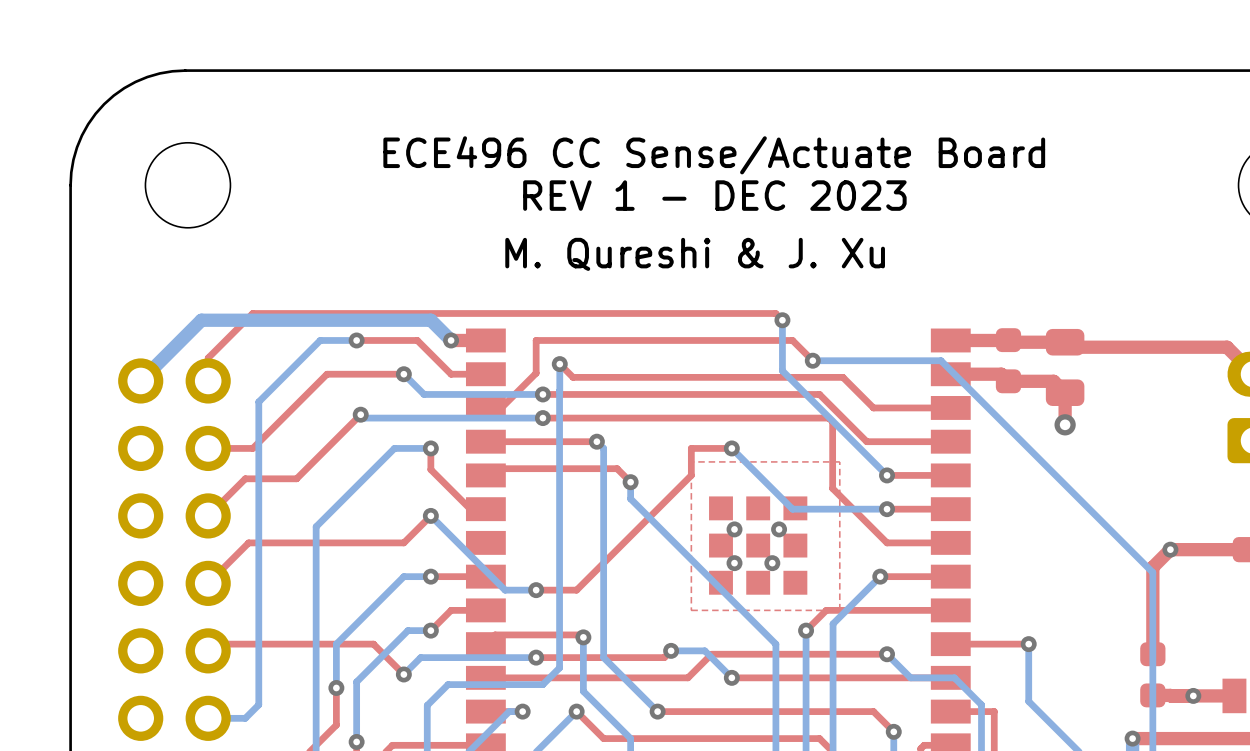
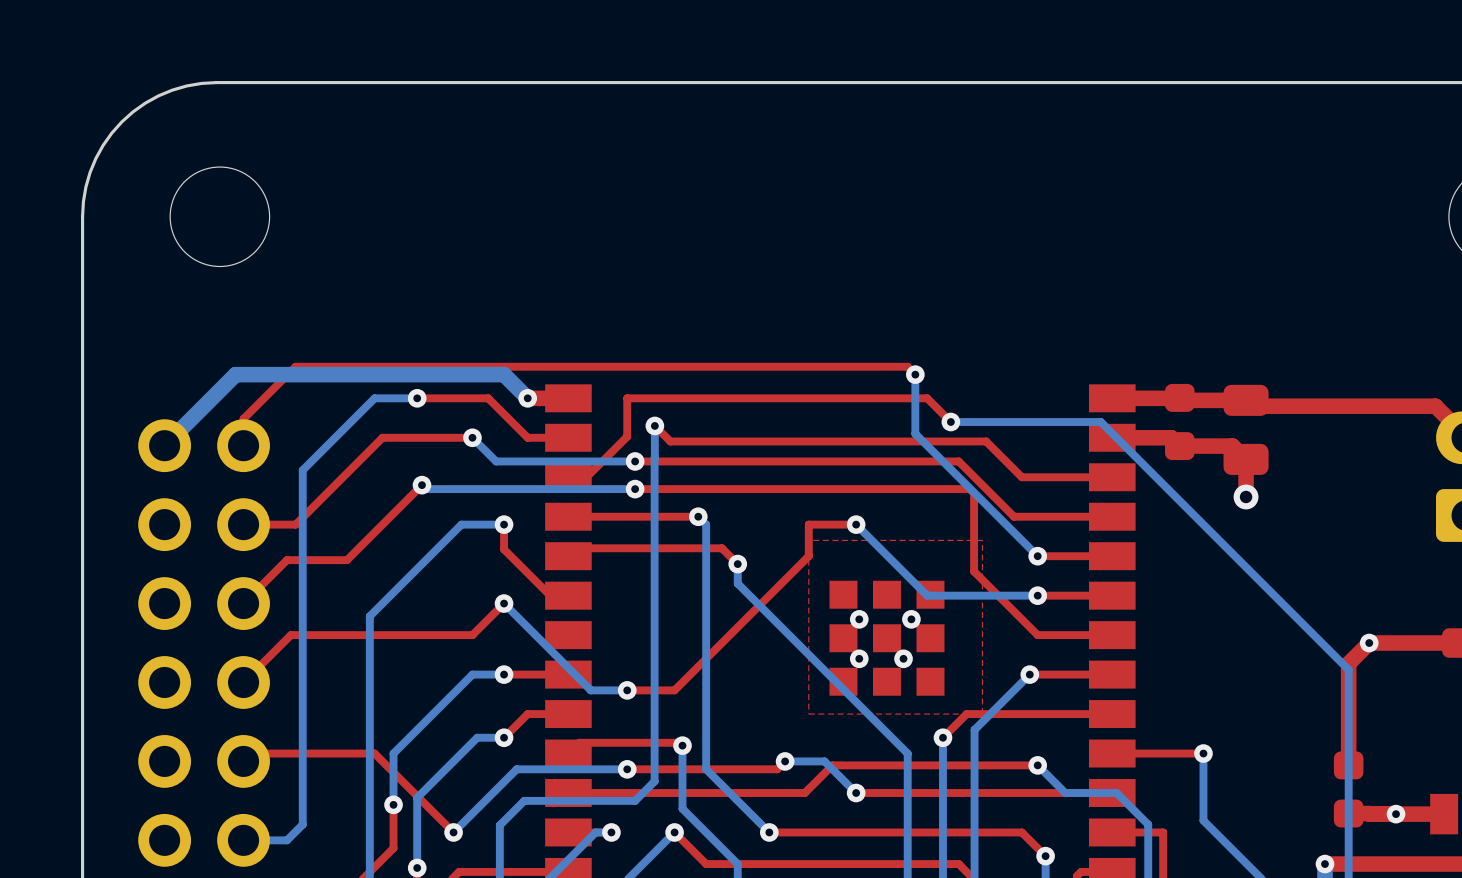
text: ECE496 CC Sense/Actuate Board (714, 155) -> none
text: REV 1 - DEC 2023 (714, 195) -> none
text: M. Qureshi & J. Xu (695, 254) -> none
top track: (320, 644) (373, 644) (403, 674) -> (374, 753) (453, 832)
bottom track: (441, 657) (420, 657) (403, 674) -> (516, 769) (453, 832)
via: (403, 674) -> none
via: none -> (453, 832)

